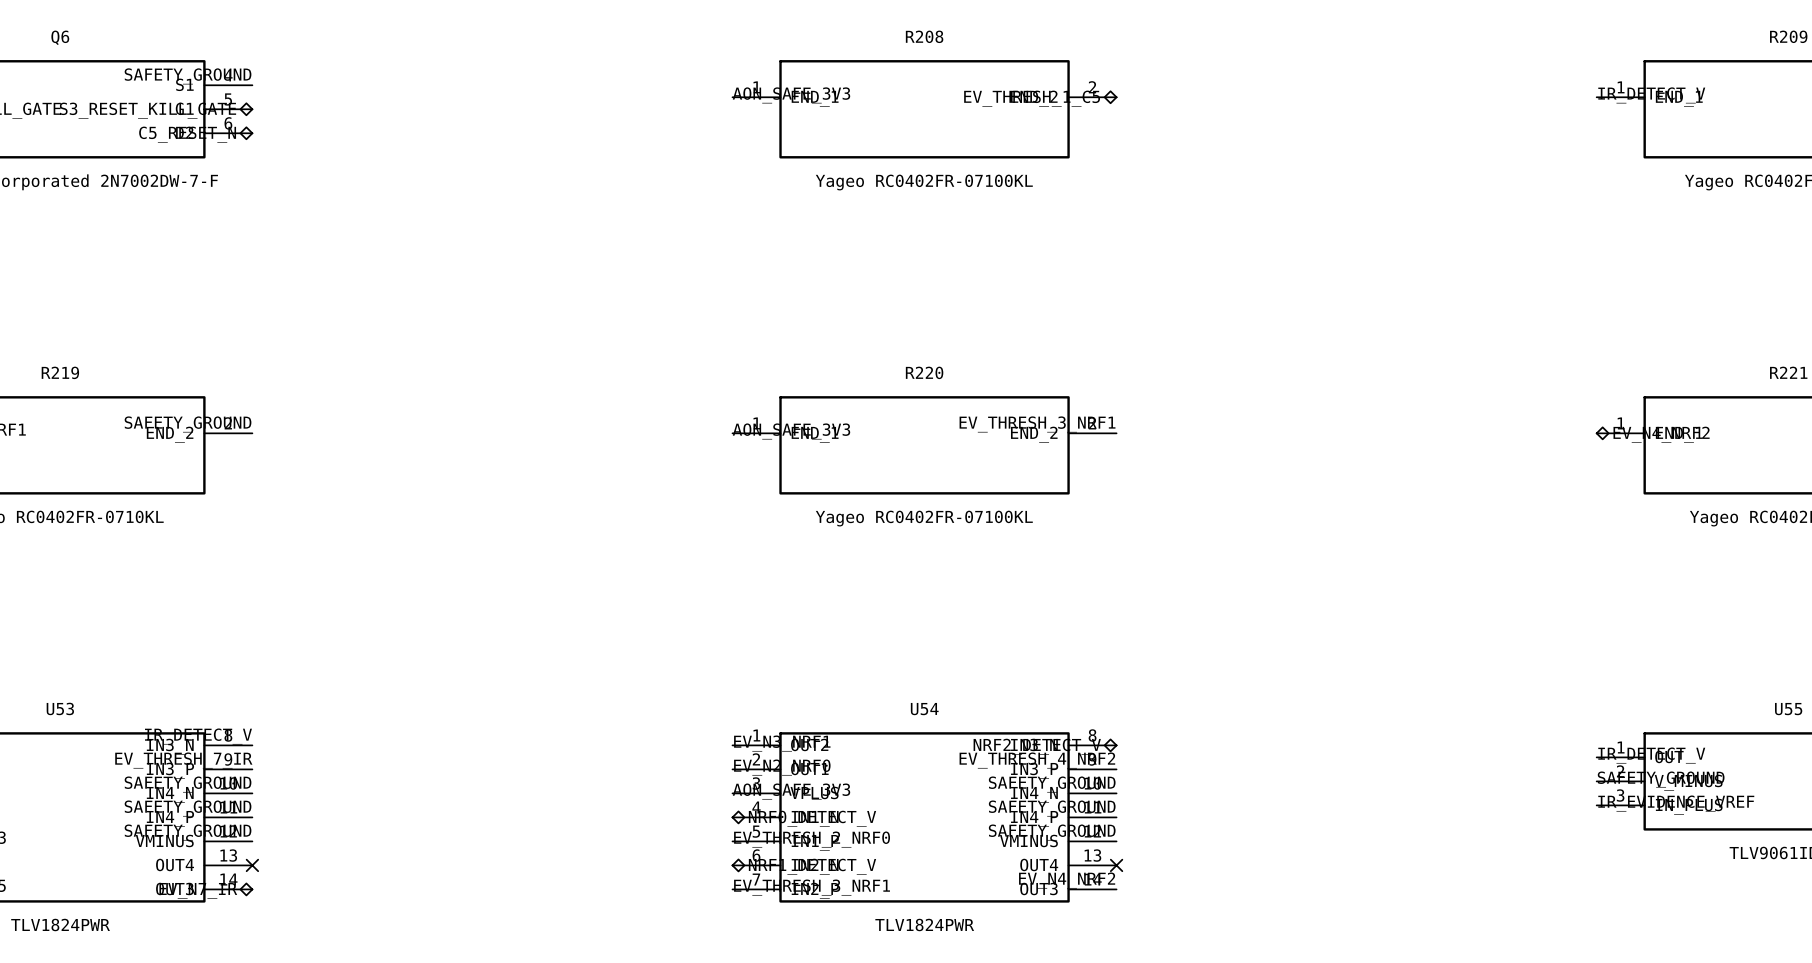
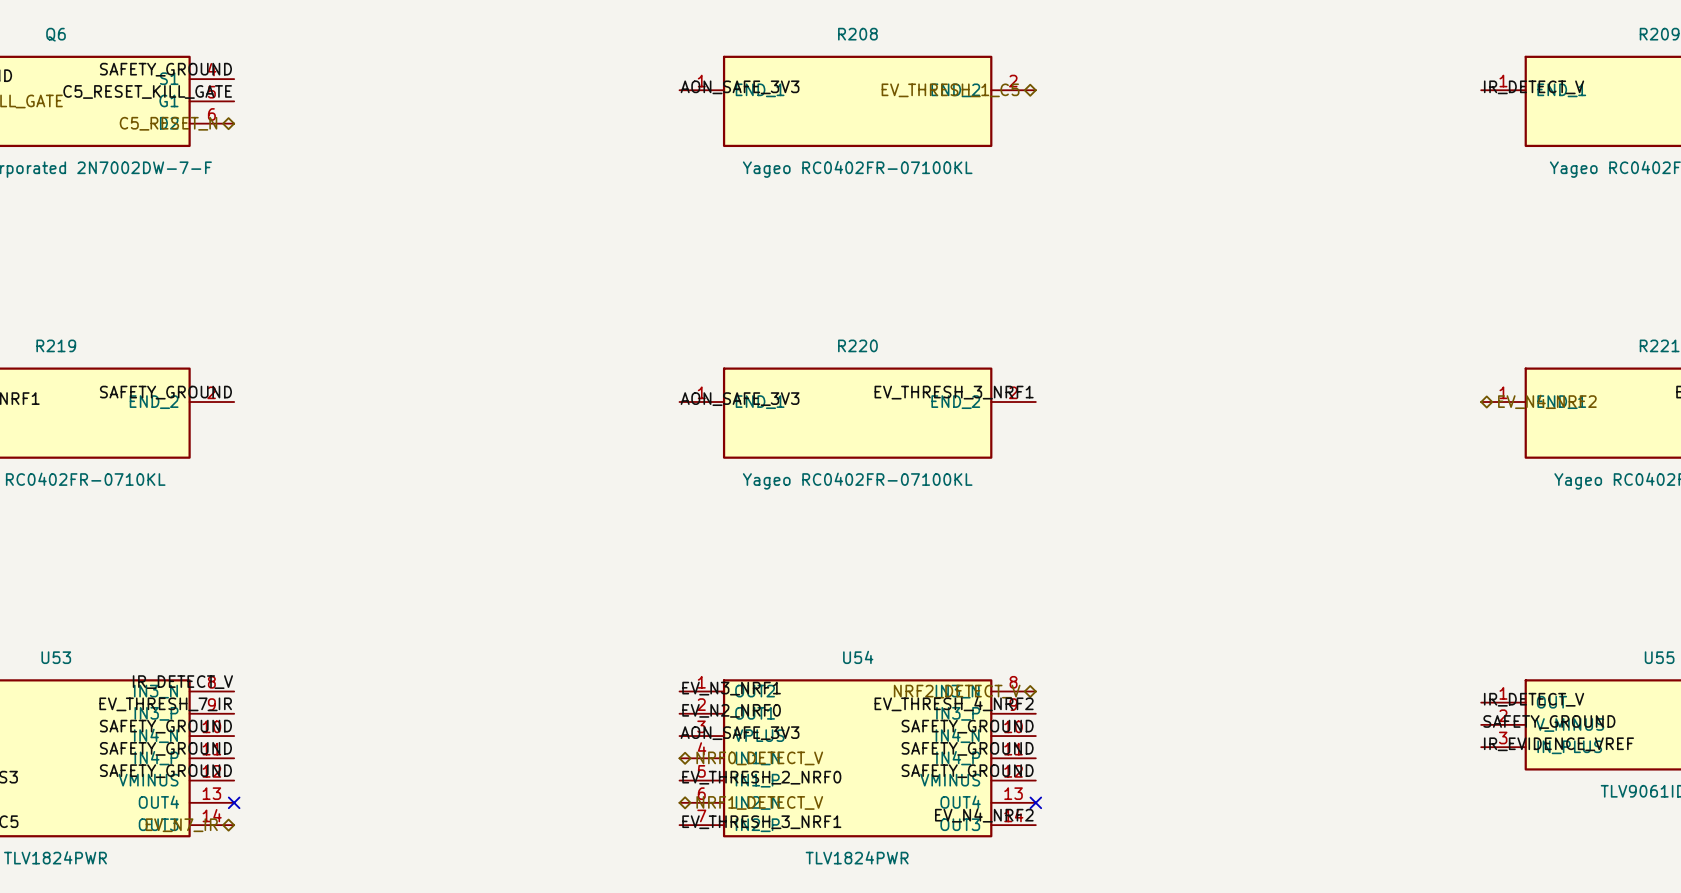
label: none -> C5_RESET_KILL_GATE (147, 91)
hierarchical label: S3_RESET_KILL_GATE (147, 110) -> none

